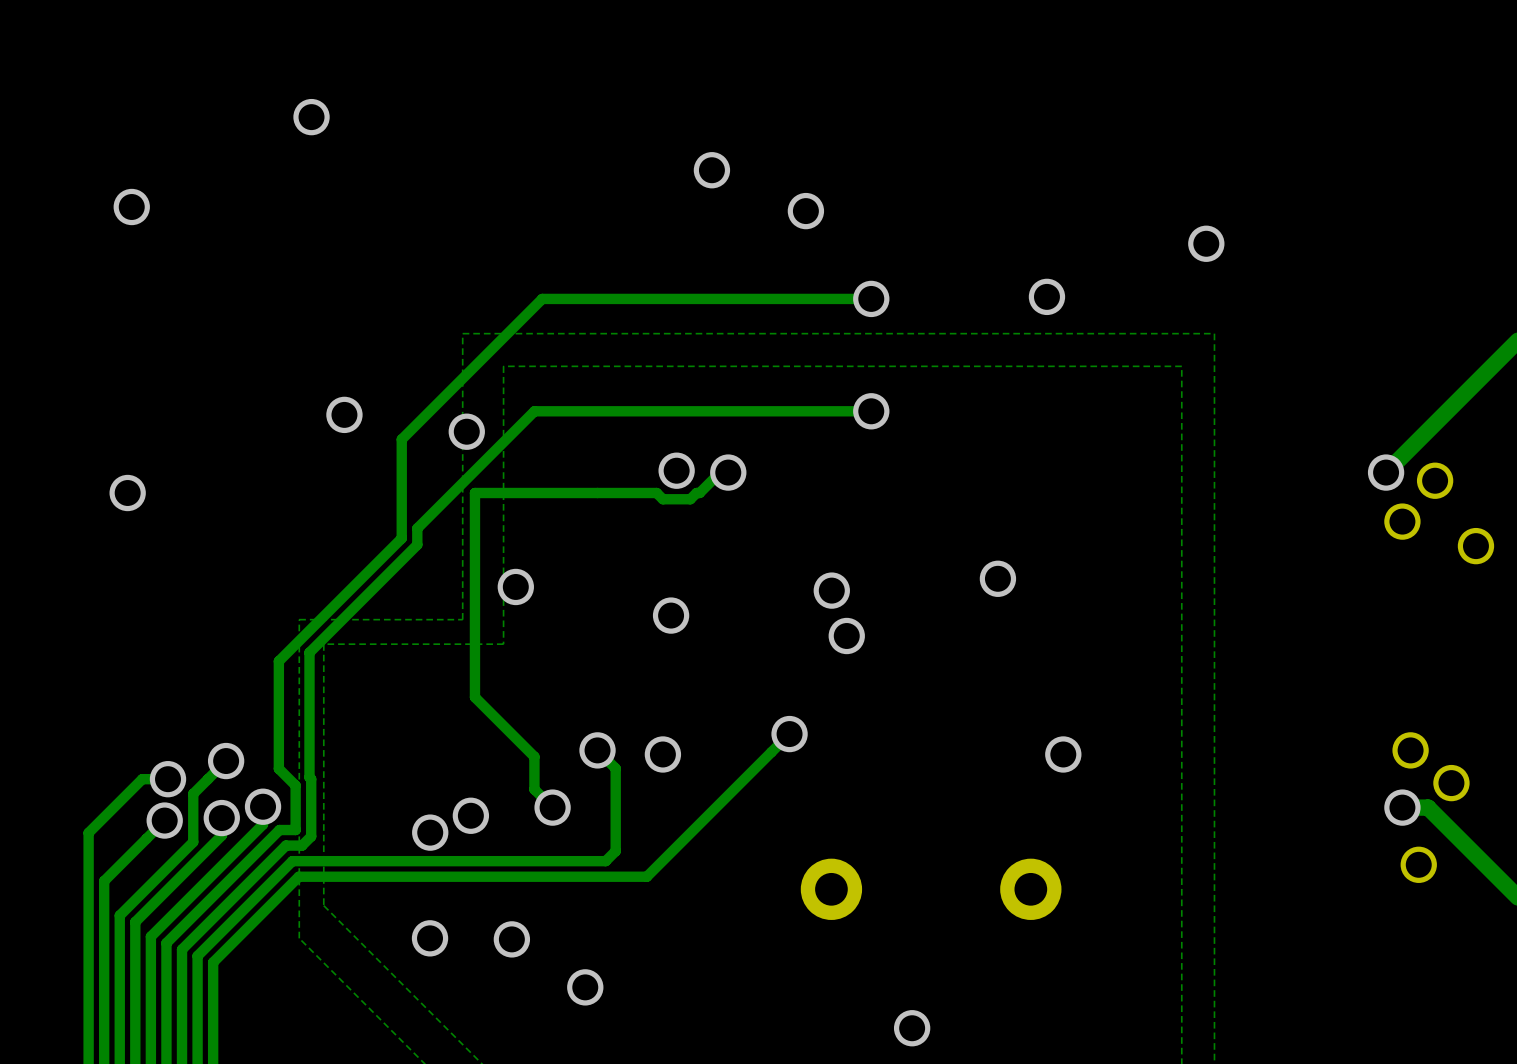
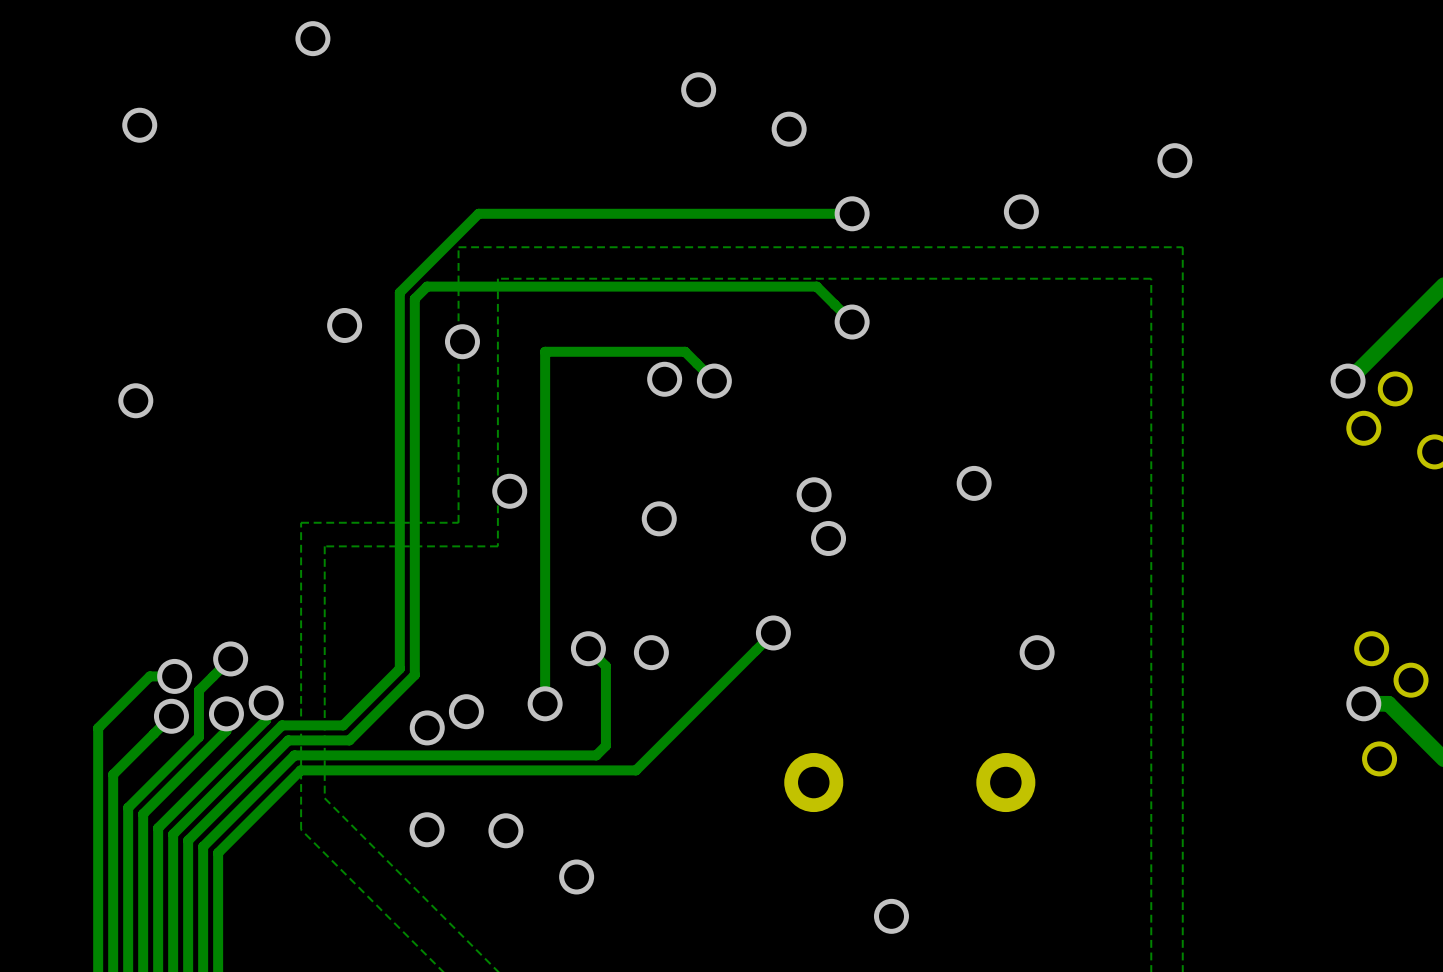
track: (542, 298) (401, 439) -> (535, 213) (478, 213) (399, 292) (399, 349)
track: (871, 411) (534, 411) (417, 528) -> (852, 322) (816, 286) (427, 286) (414, 298) (414, 434)
track: (720, 472) (699, 493) (696, 493) (690, 499) (662, 499) (656, 493) (474, 493) (474, 697) (534, 756) (534, 789) (552, 807) -> (714, 381) (685, 351) (545, 351) (545, 703)
track: (401, 538) (278, 661) (278, 768) (295, 785) (295, 830) -> (399, 444) (399, 668) (343, 725) (297, 725)
track: (417, 544) (309, 652) (311, 836) (302, 845) -> (414, 450) (414, 675) (349, 740) (303, 740)

